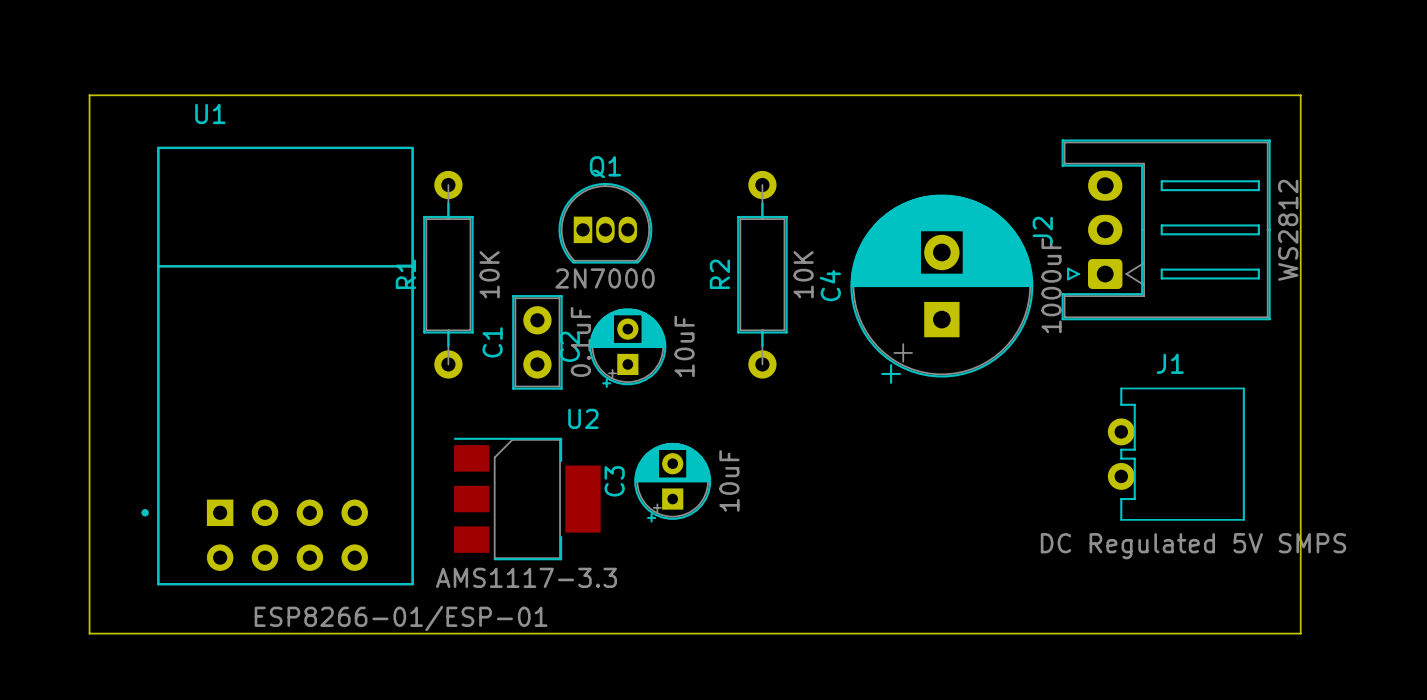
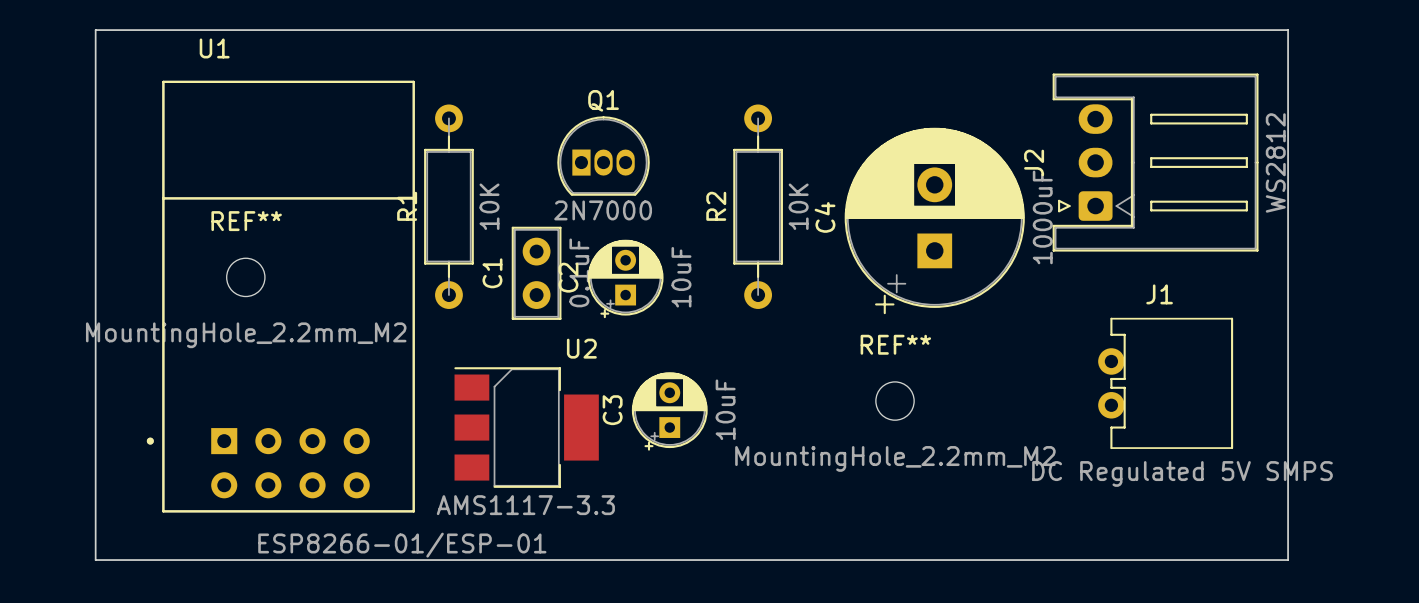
REF**: none -> MountingHole_2.2mm_M2 (245, 277)
REF**: none -> MountingHole_2.2mm_M2 (895, 401)

